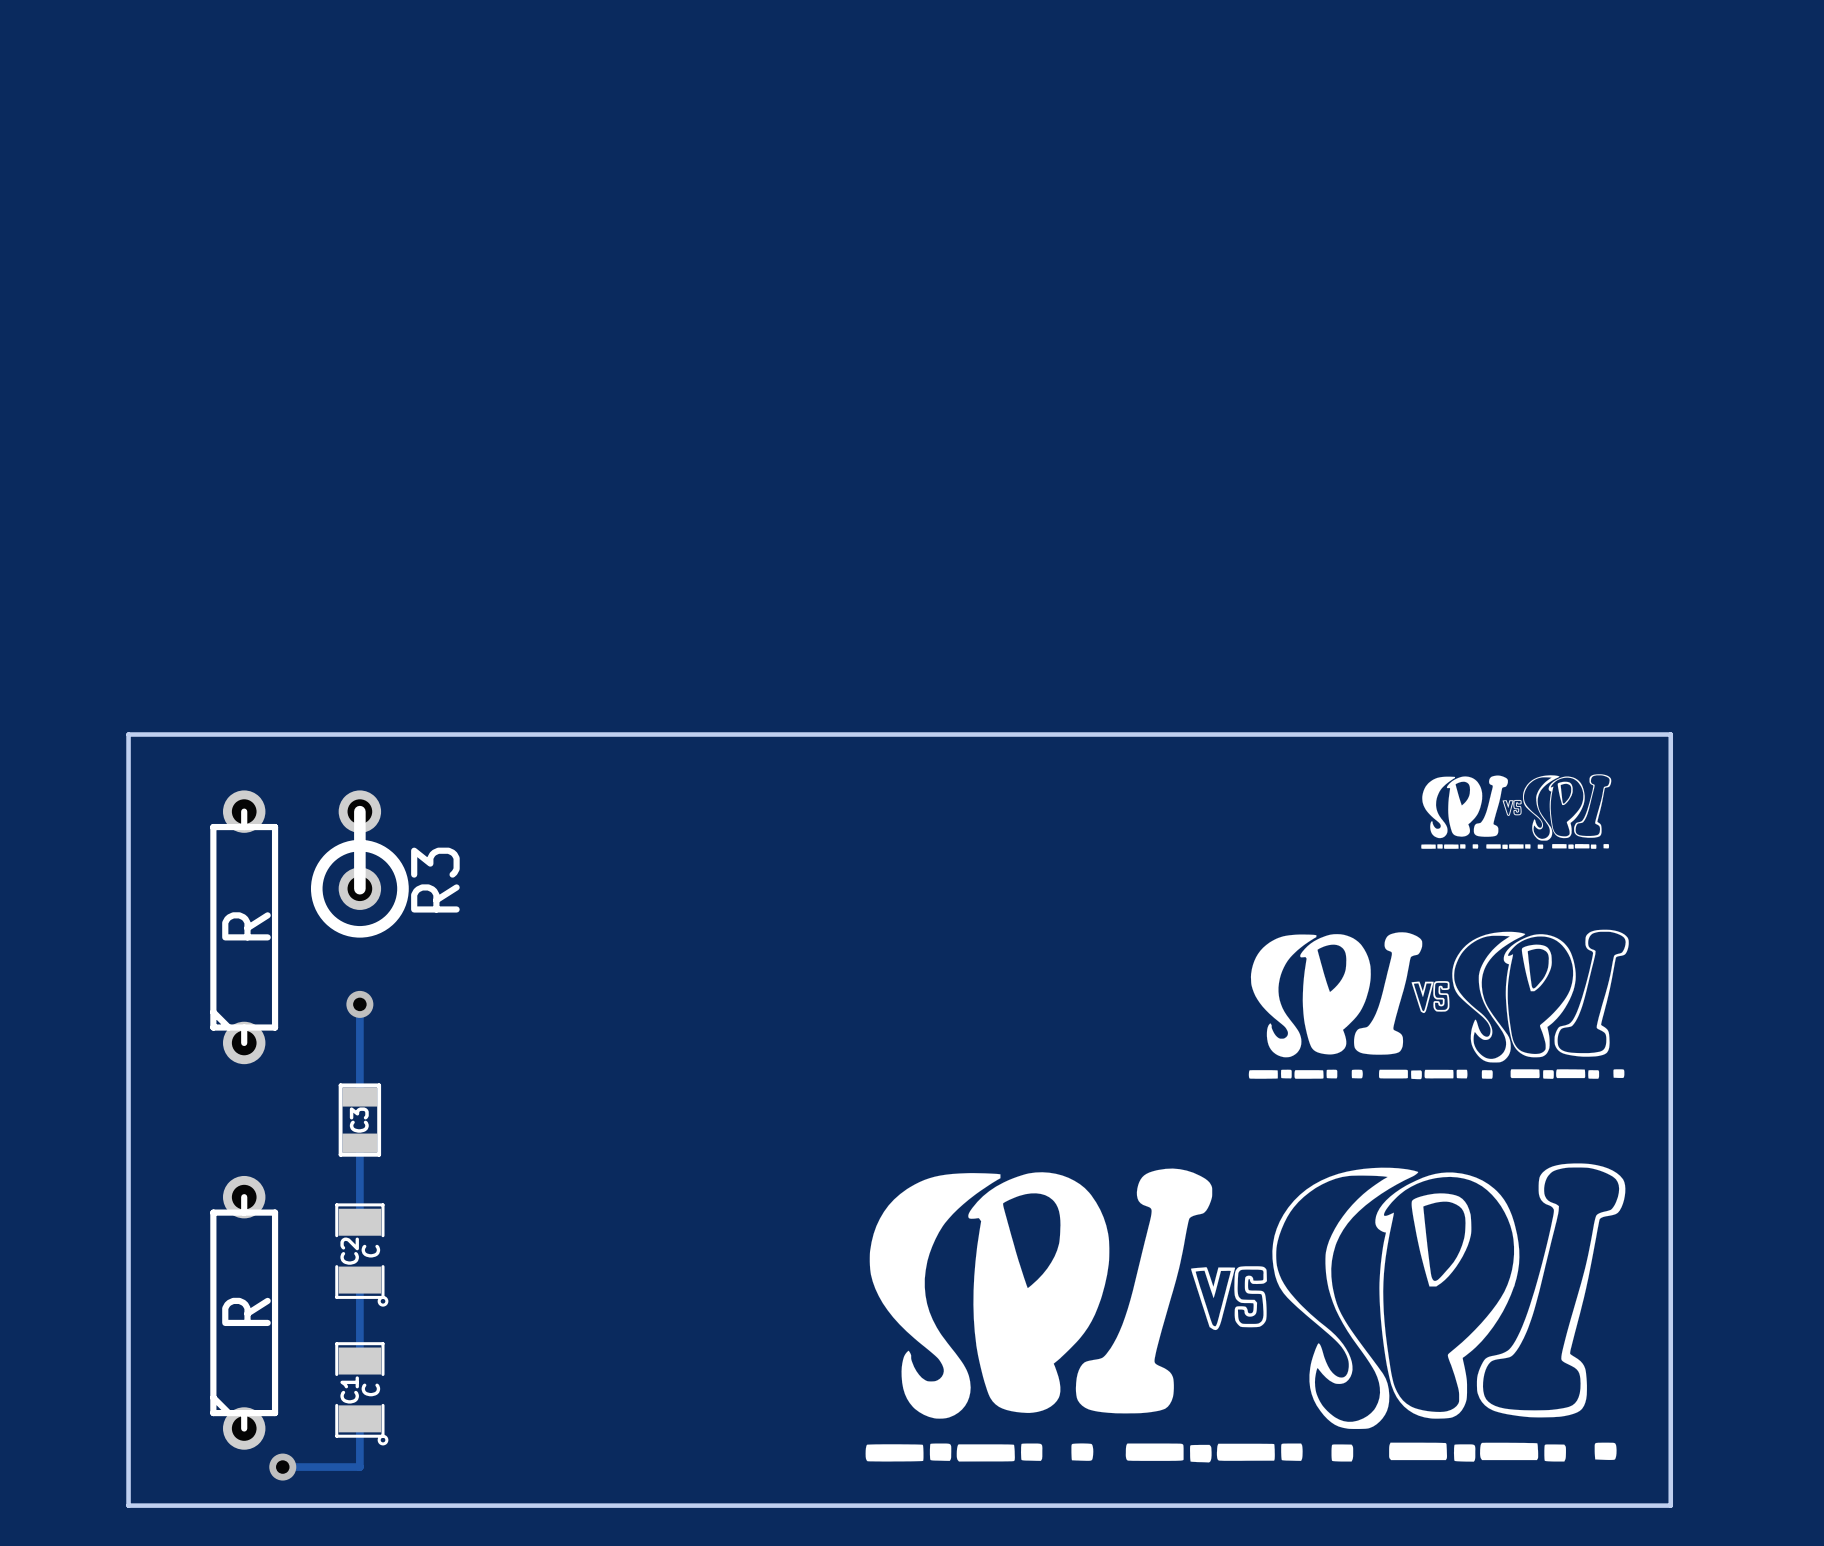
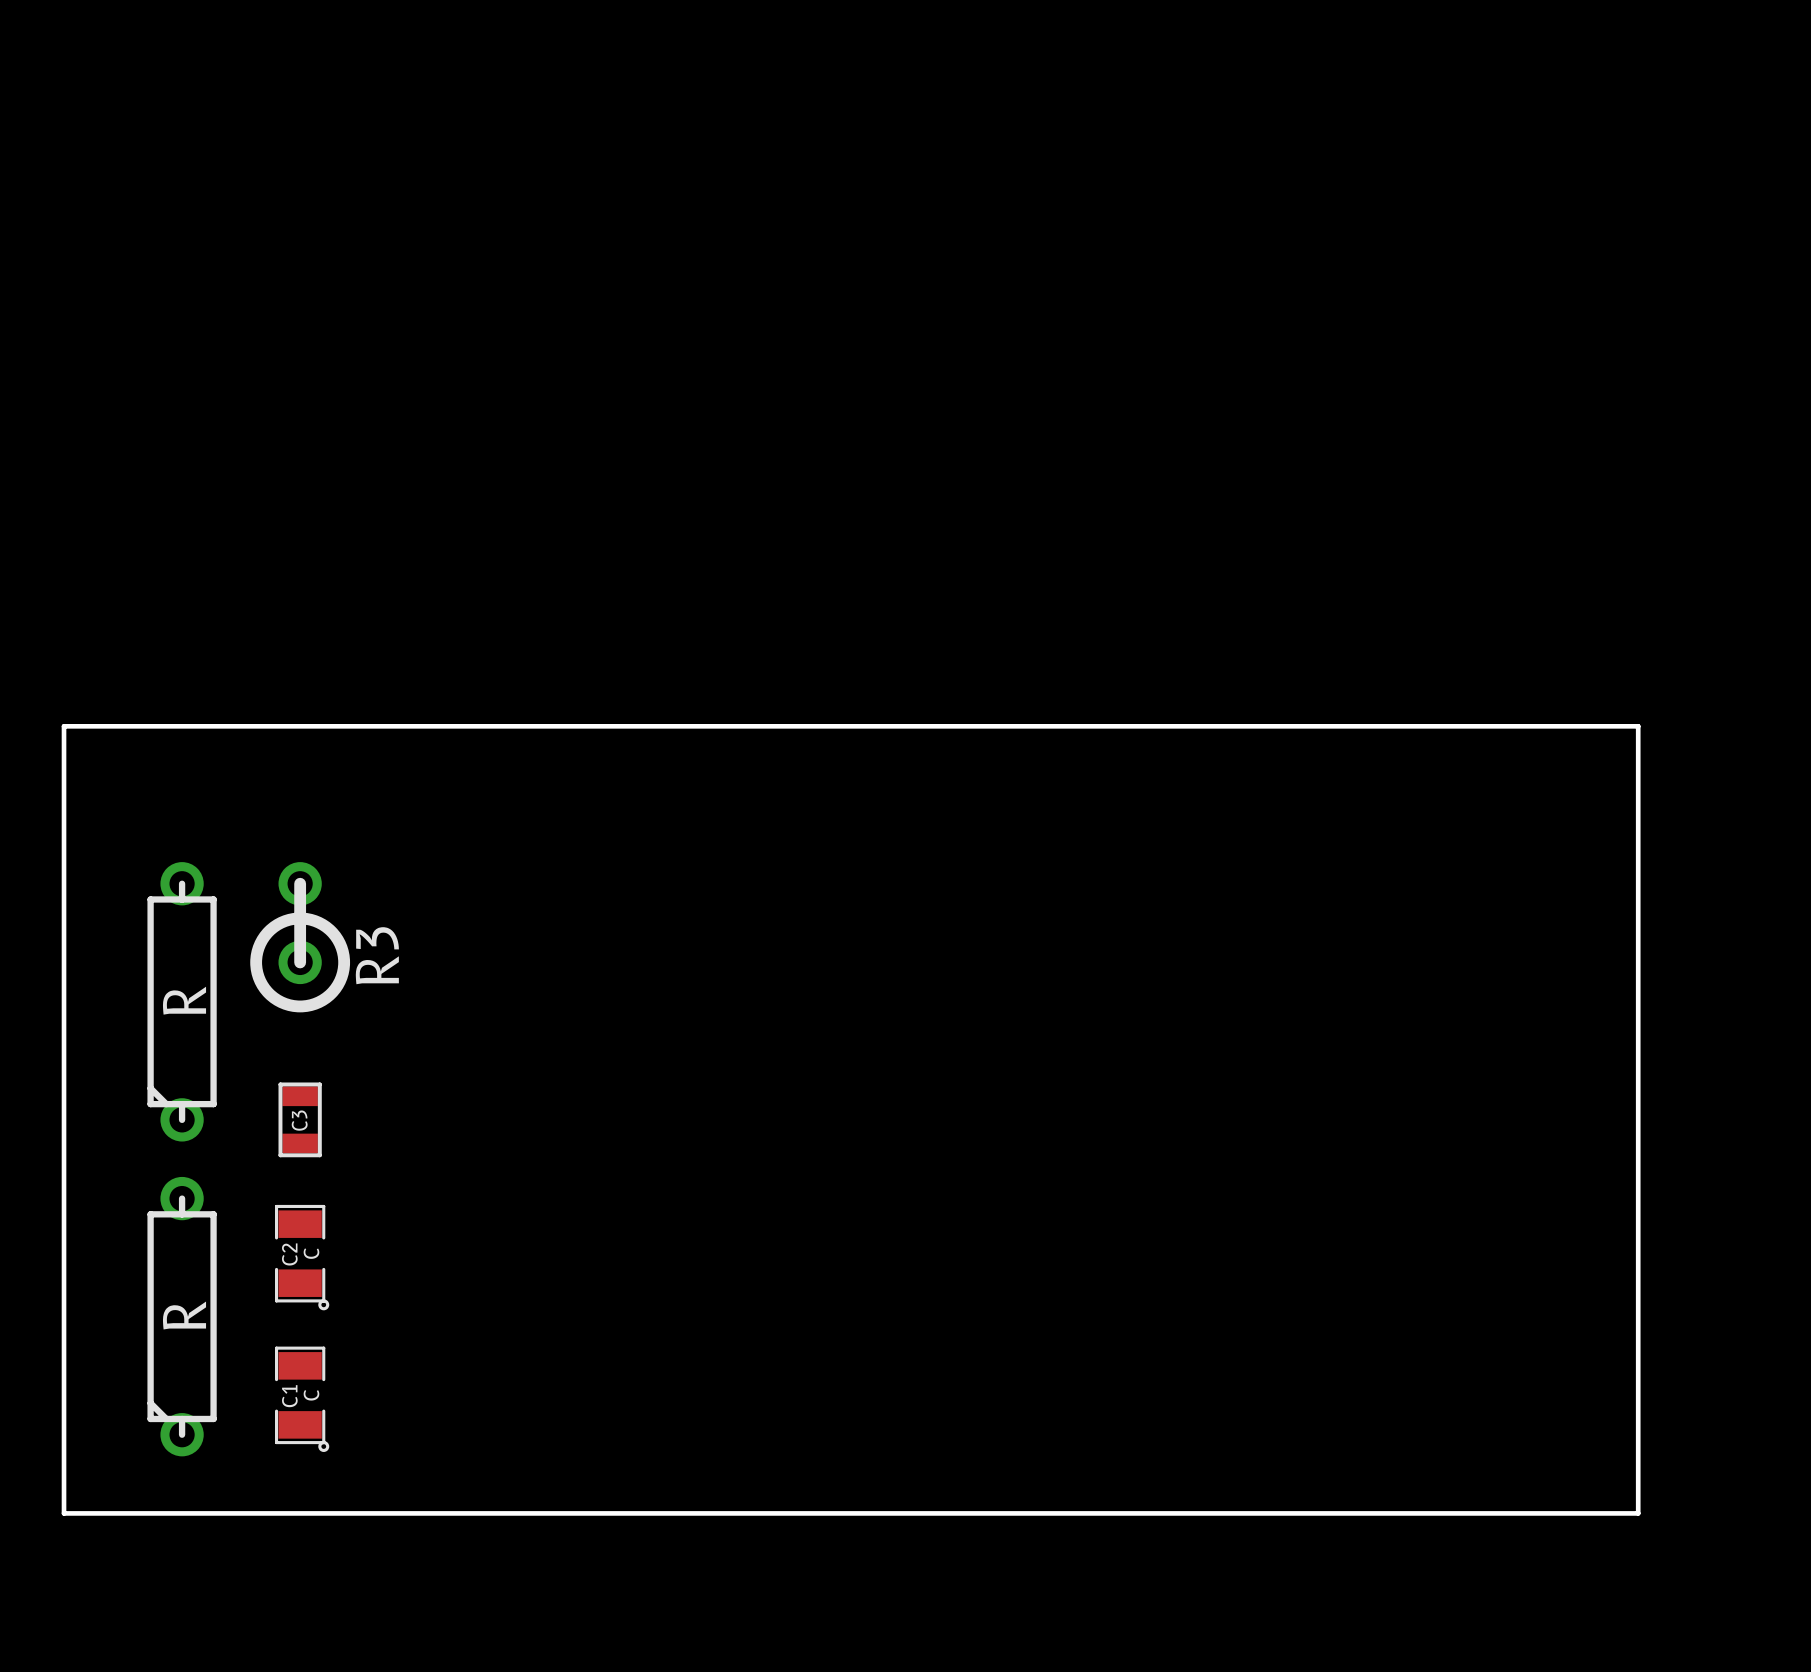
drawing: [1421, 774, 1612, 850] -> none
R3 position: (359, 864) -> (300, 937)
part position: (244, 927) -> (182, 1001)
drawing: [1248, 929, 1629, 1080] -> none
track: (359, 1004) (359, 1096) -> none
via: (359, 1004) -> none
track: (359, 1143) (359, 1222) -> none
drawing: [865, 1163, 1626, 1463] -> none
track: (359, 1280) (359, 1361) -> none
track: (359, 1418) (359, 1467) (282, 1467) -> none
via: (282, 1467) -> none

